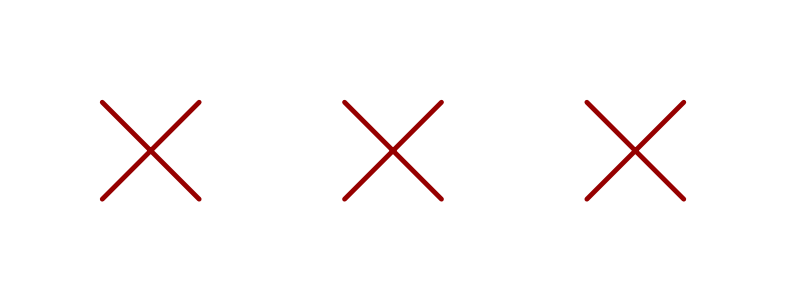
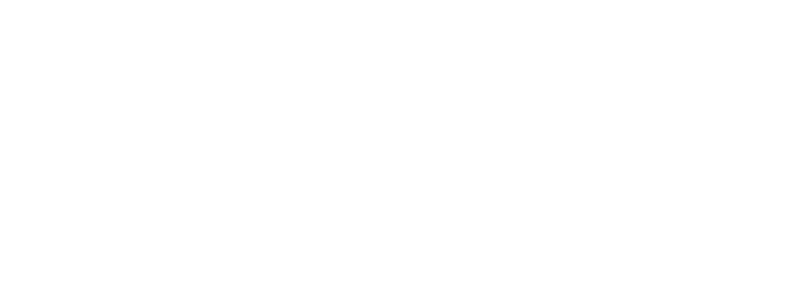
part: (150, 150) -> none
part: (393, 150) -> none
part: (635, 150) -> none

